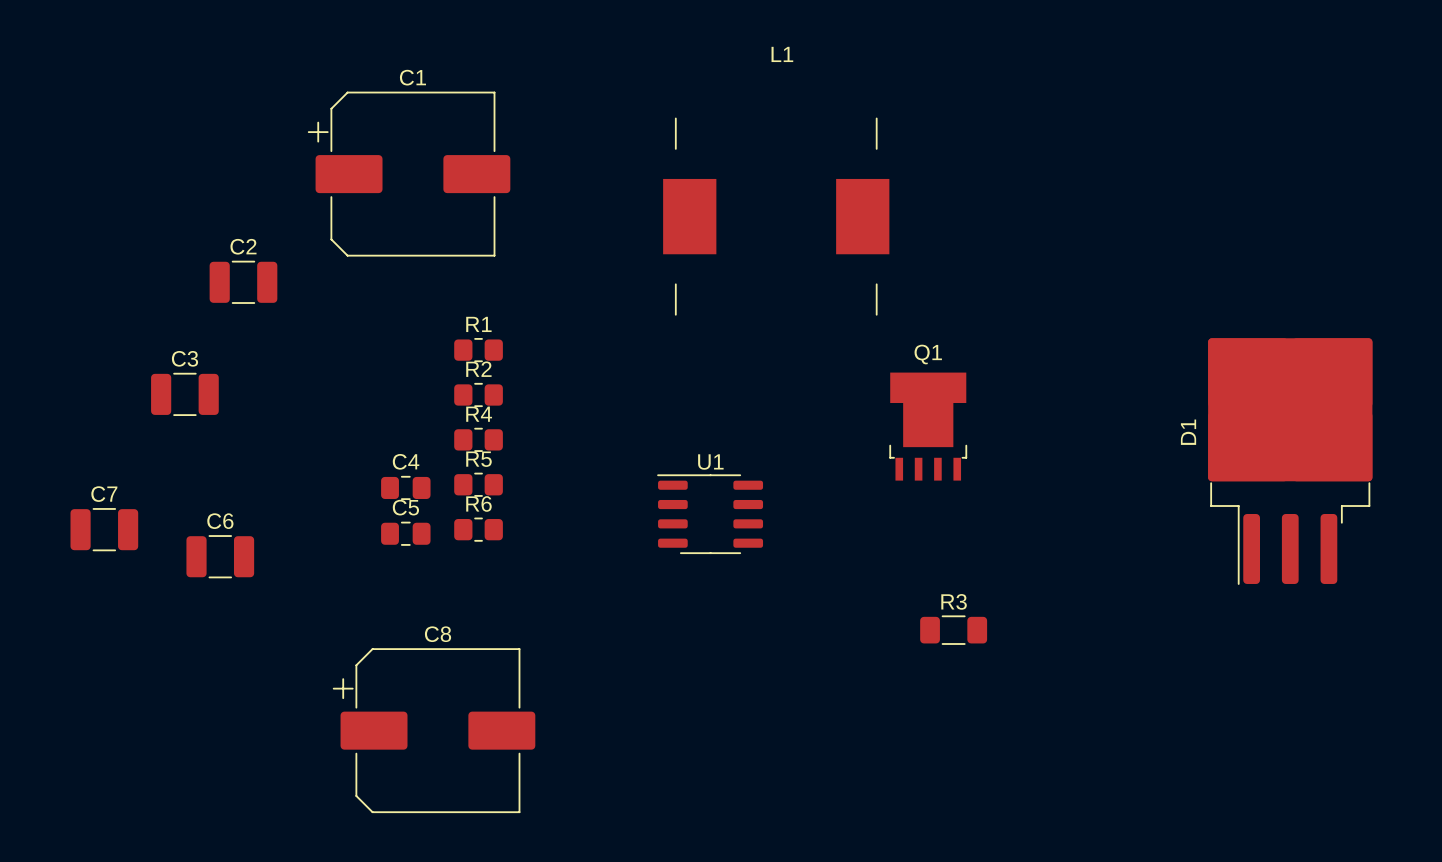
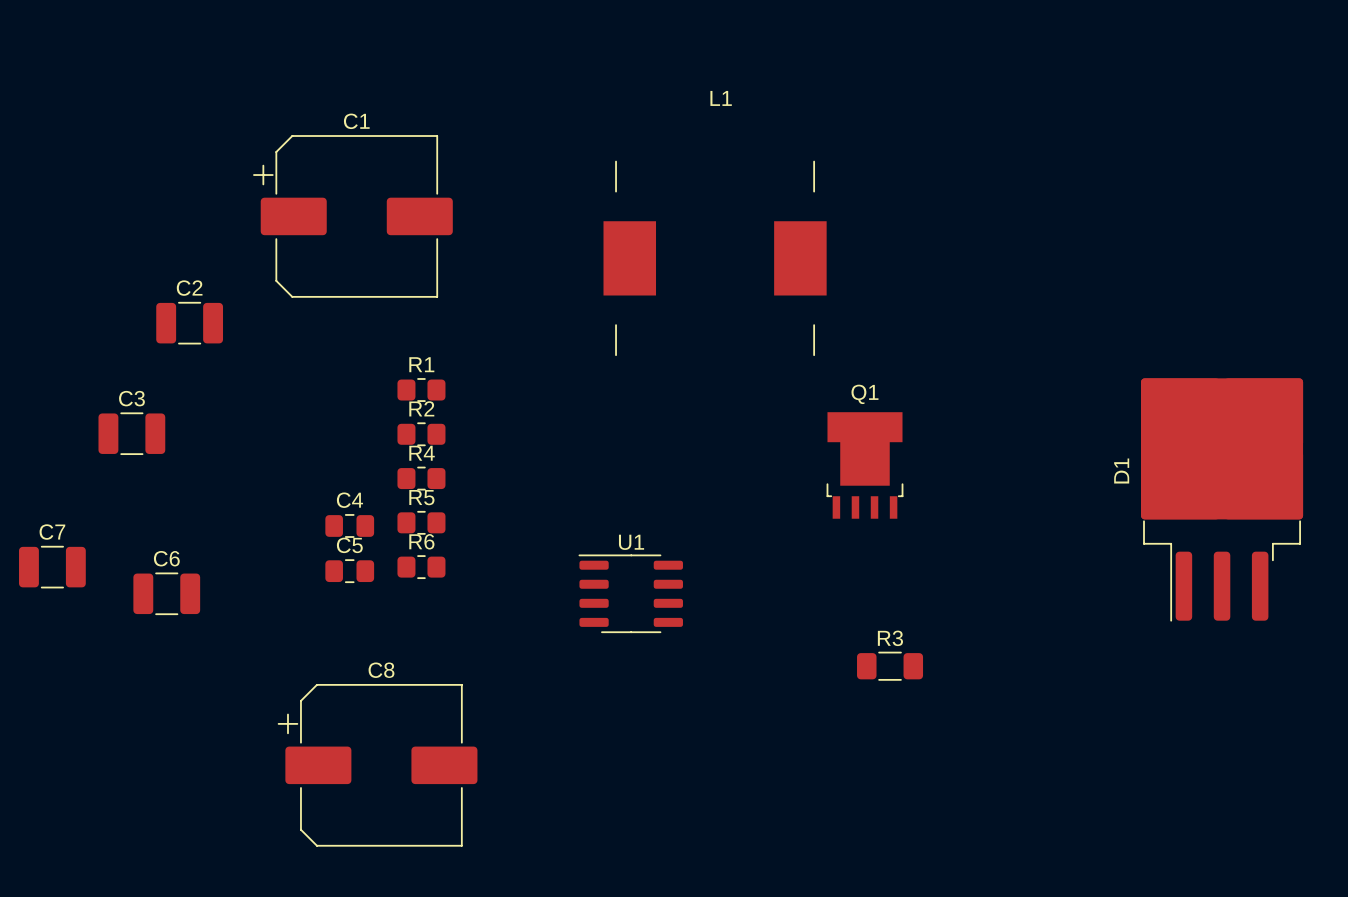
U1 position: (710, 514) -> (630, 593)

